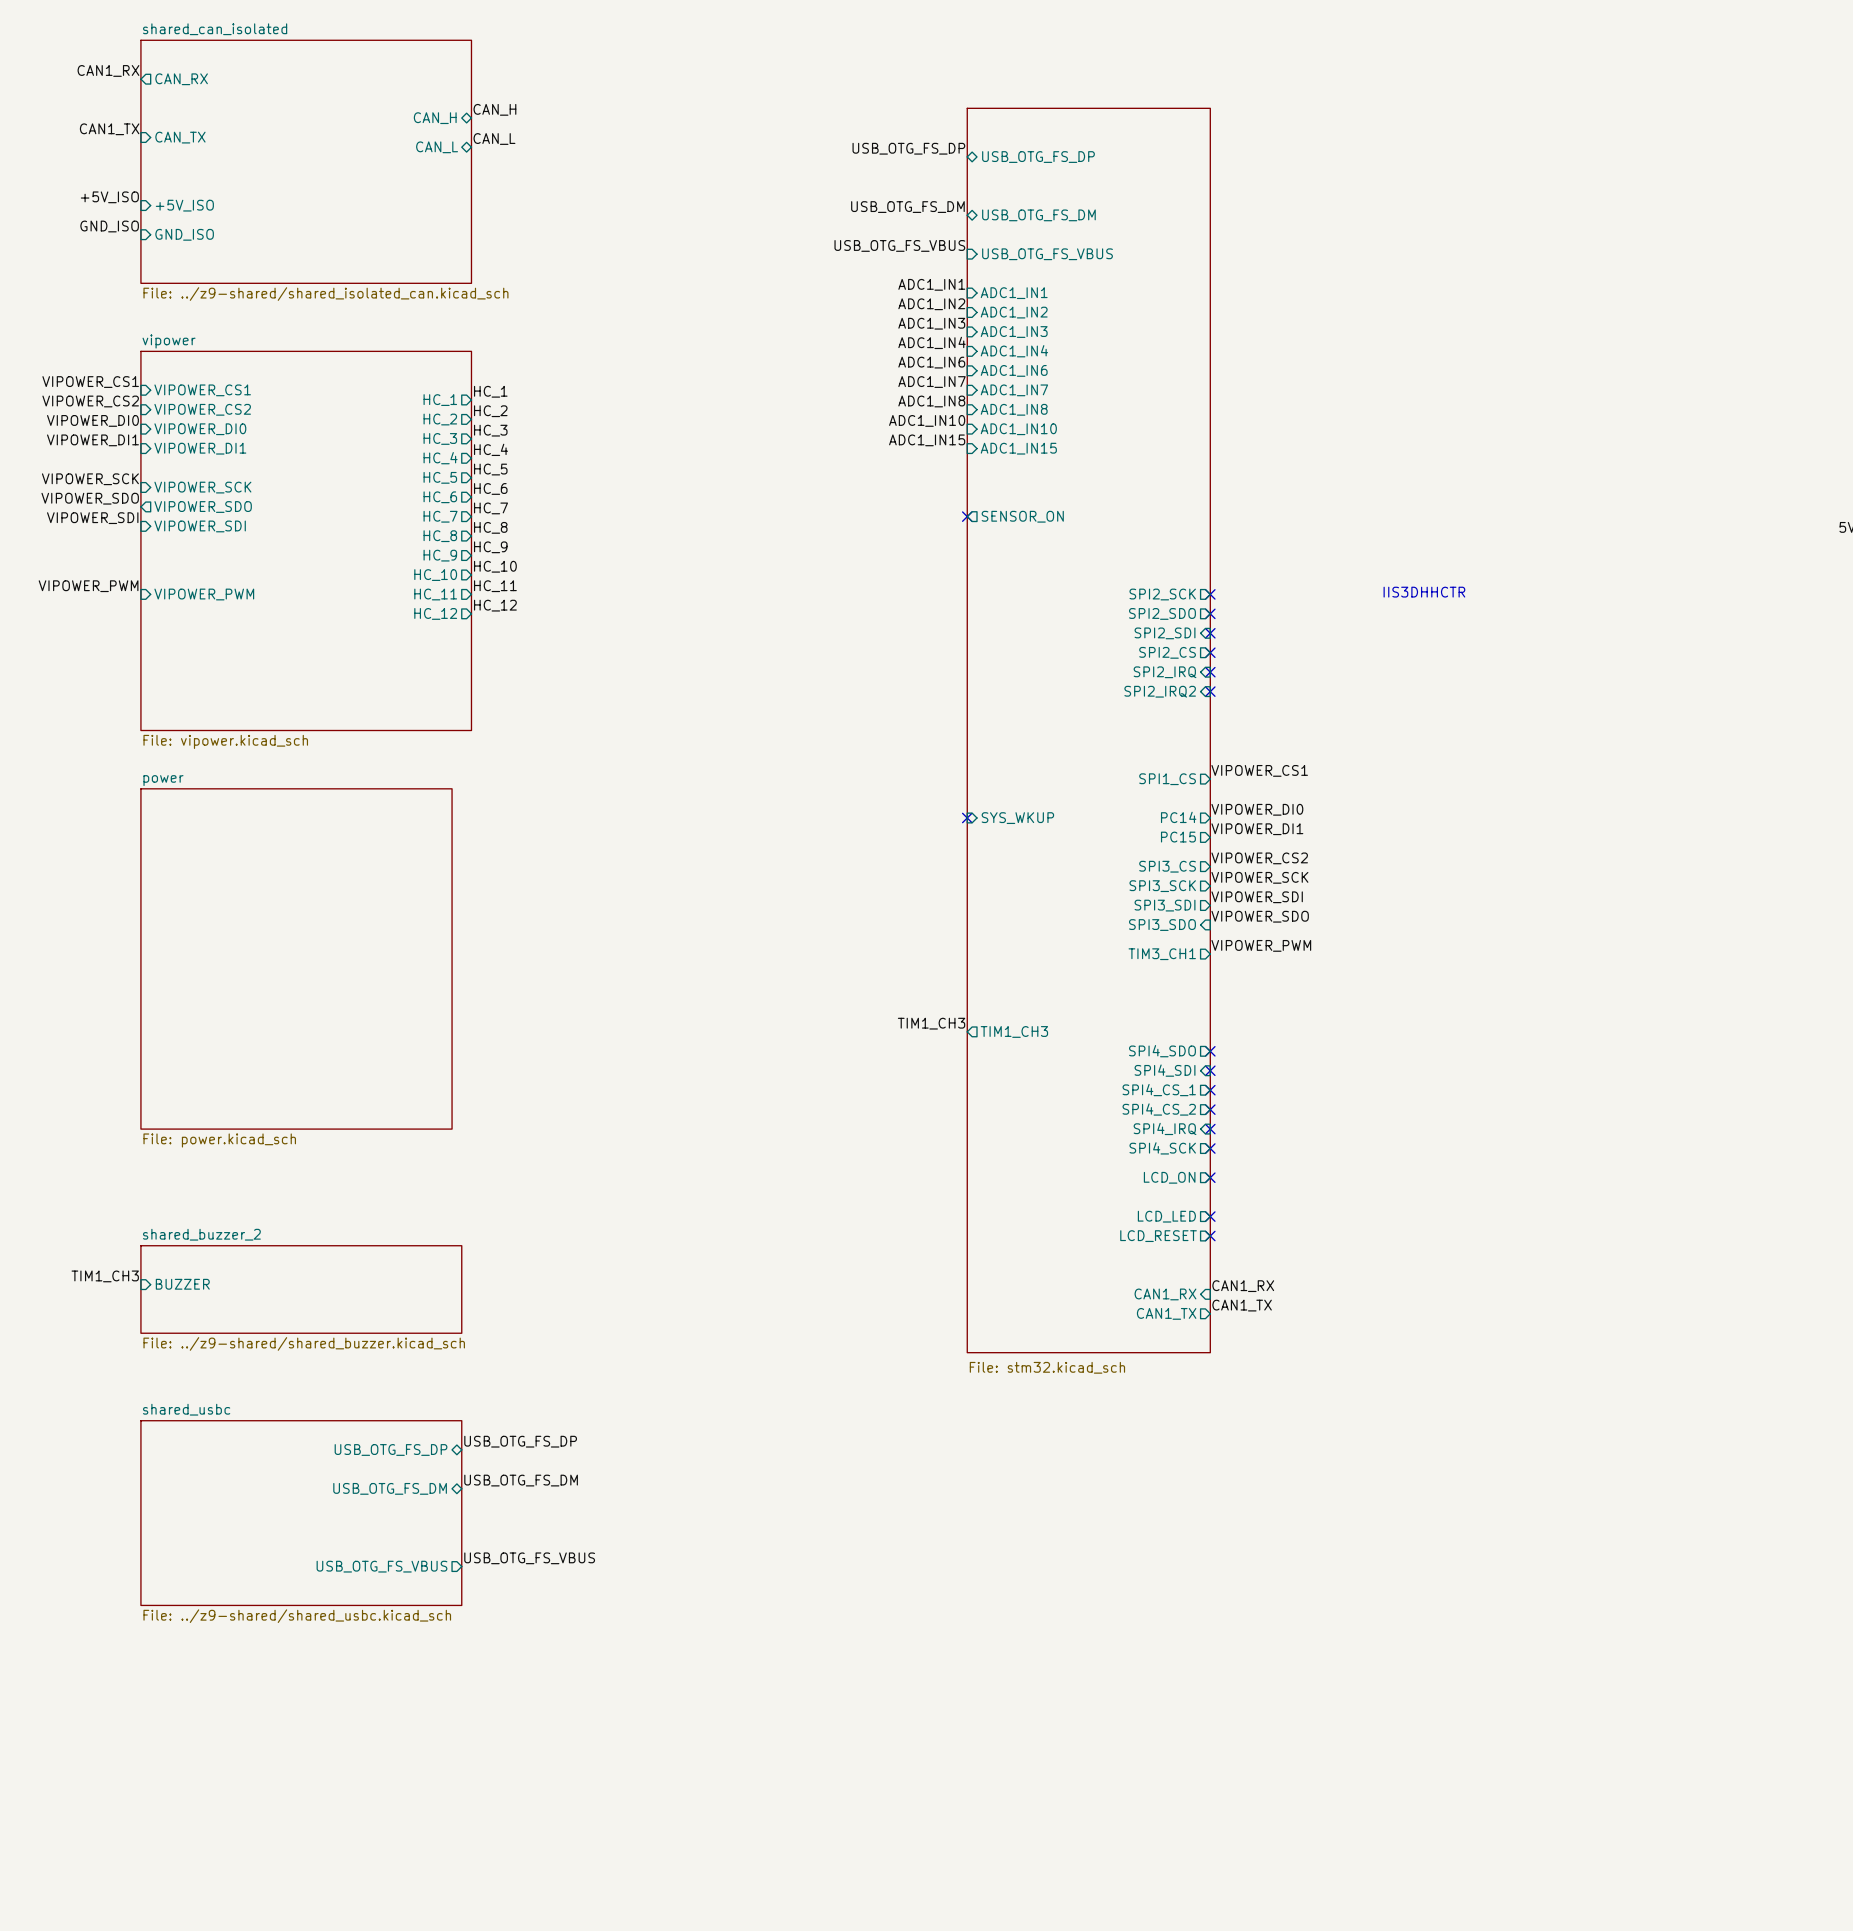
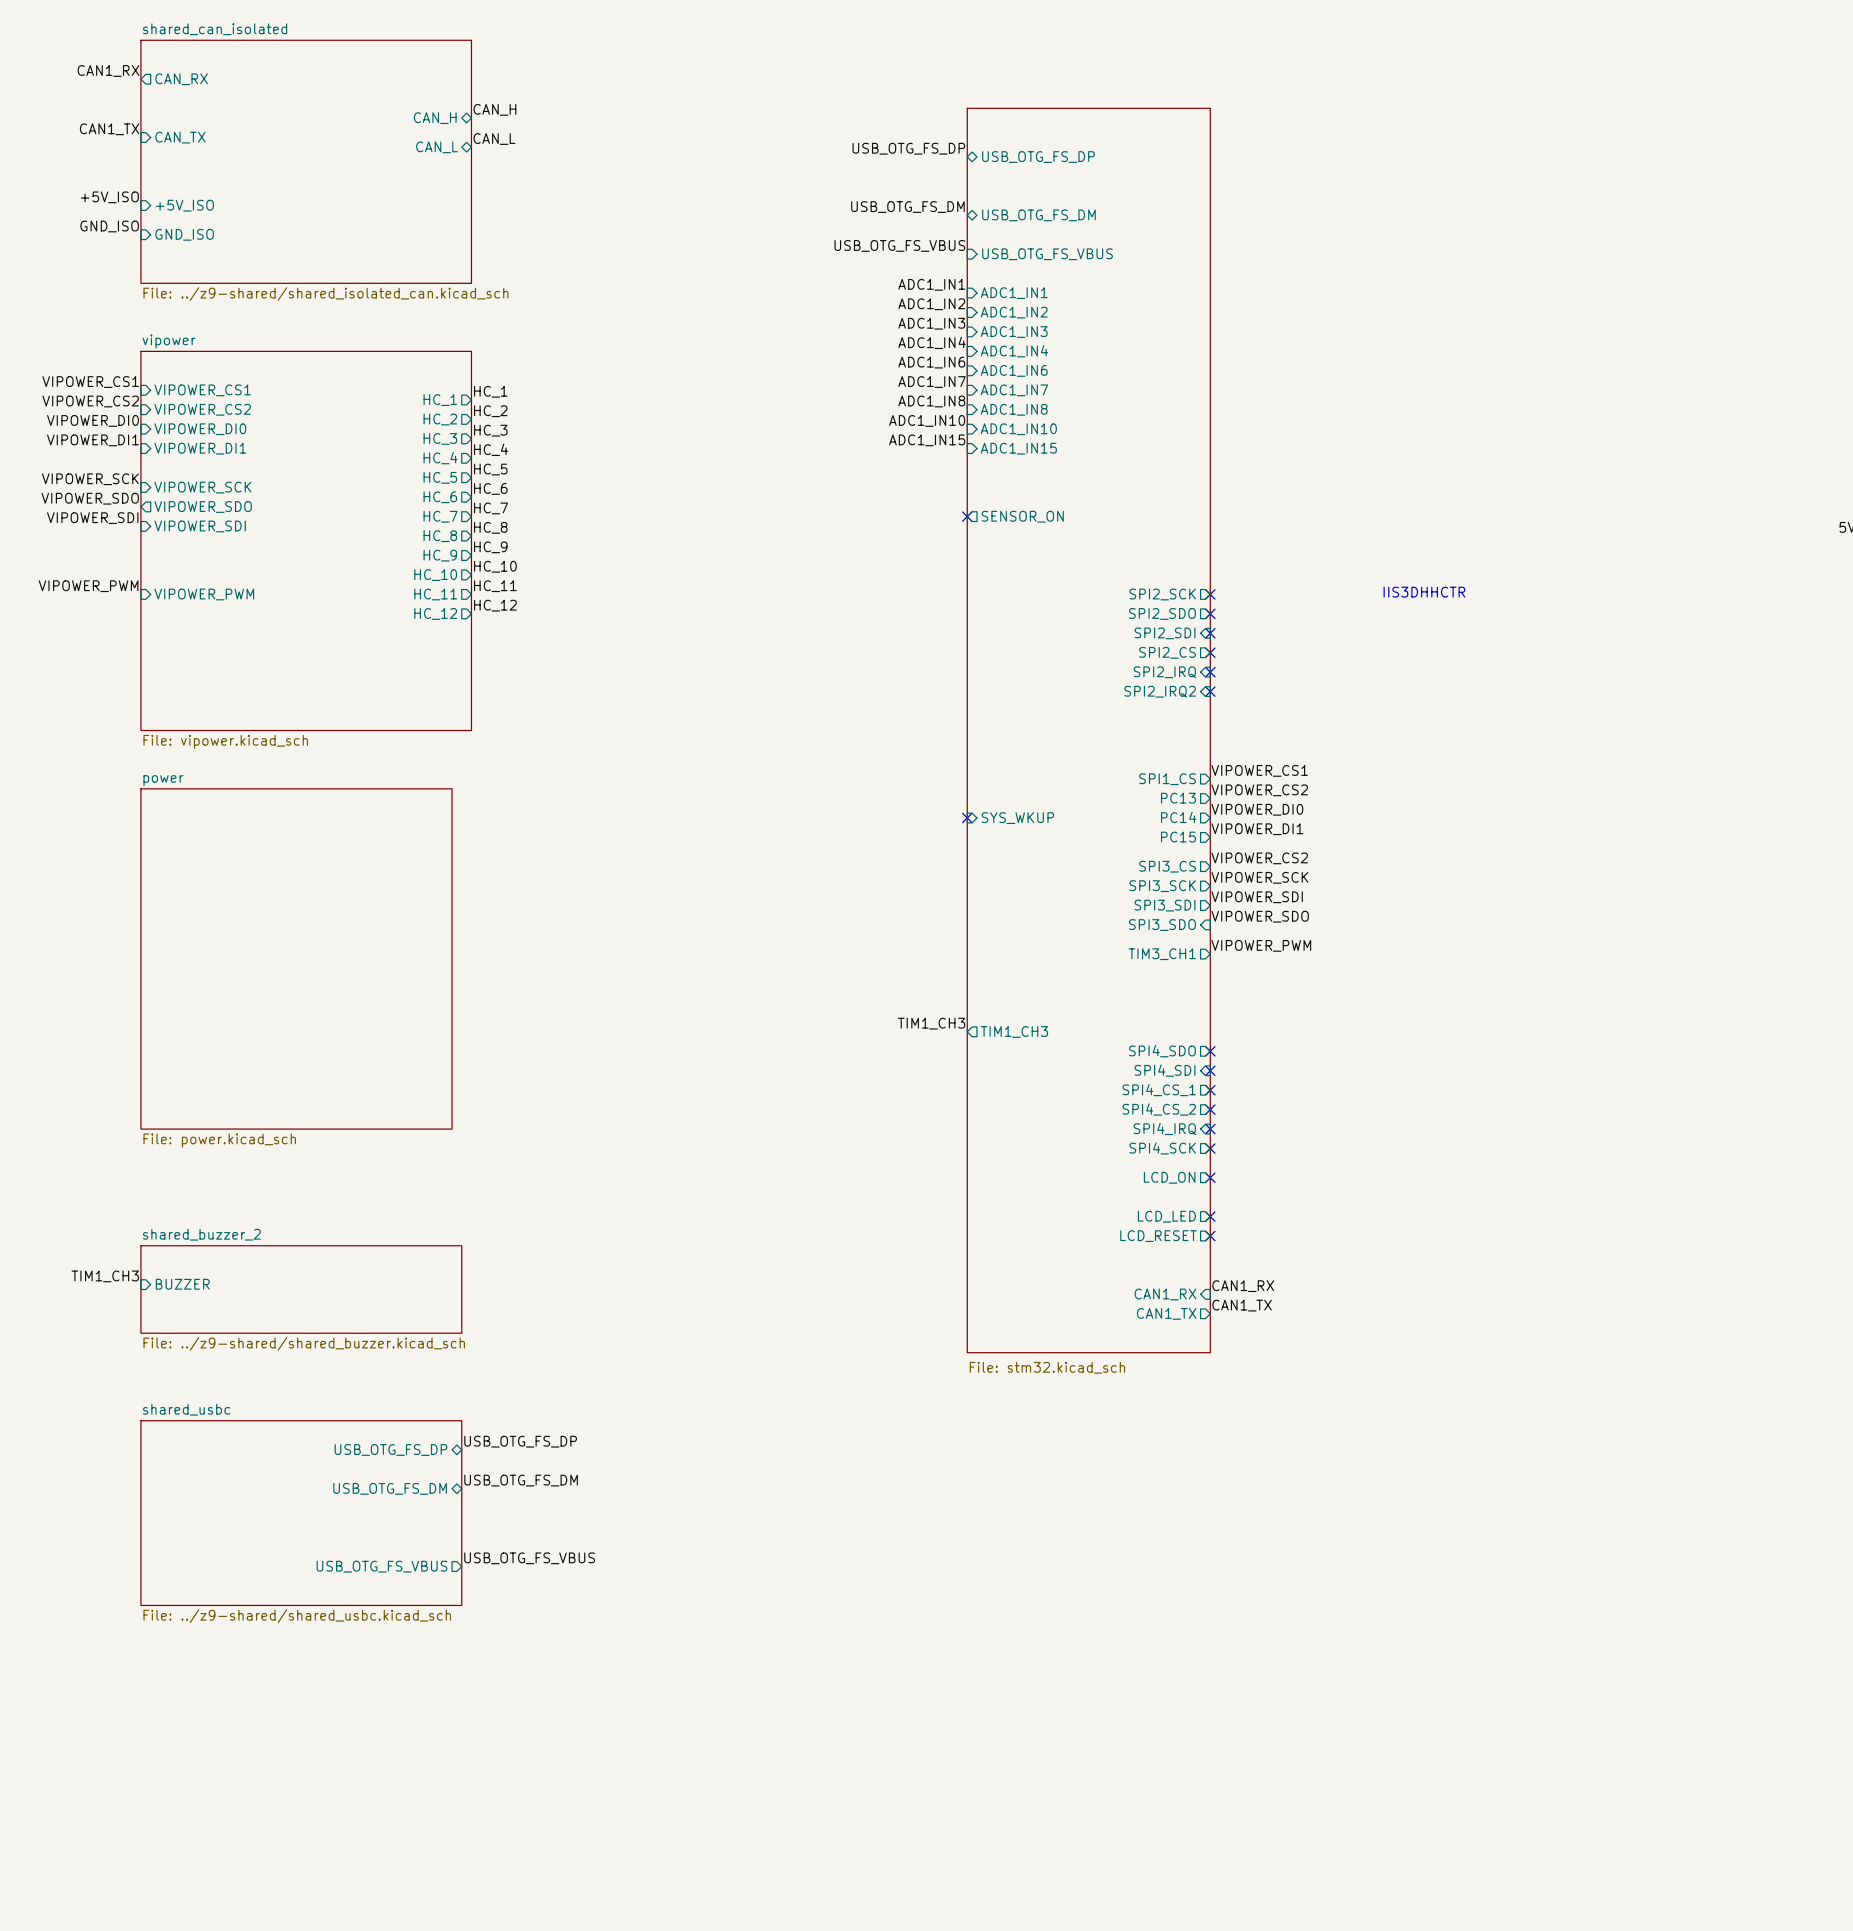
label: none -> VIPOWER_CS2 (1259, 790)
sheet pin: none -> PC13 (1178, 798)

